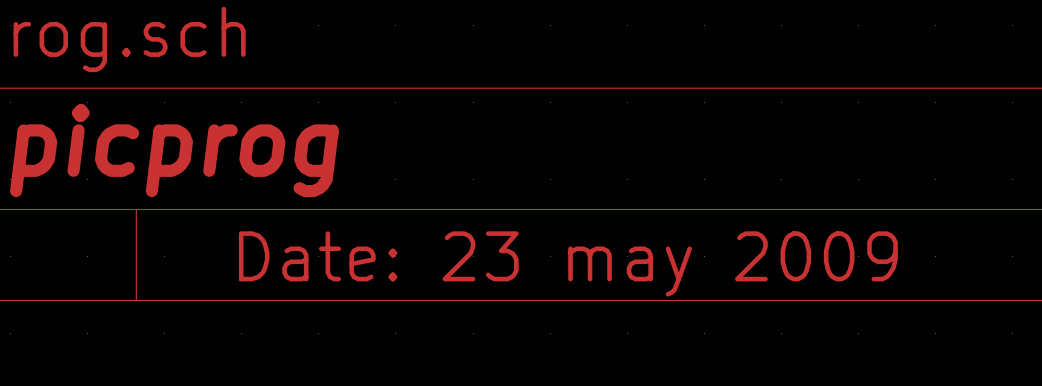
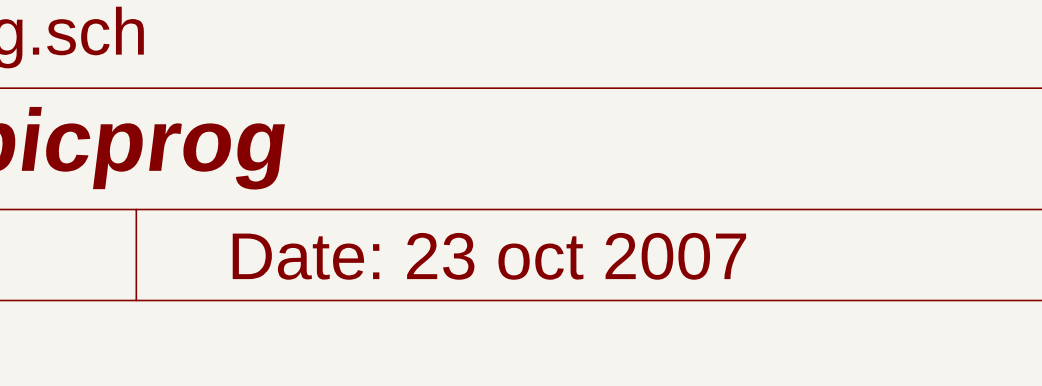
title block: Date: 23 may 2009 (568, 263) -> Date: 23 oct 2007 (489, 256)

